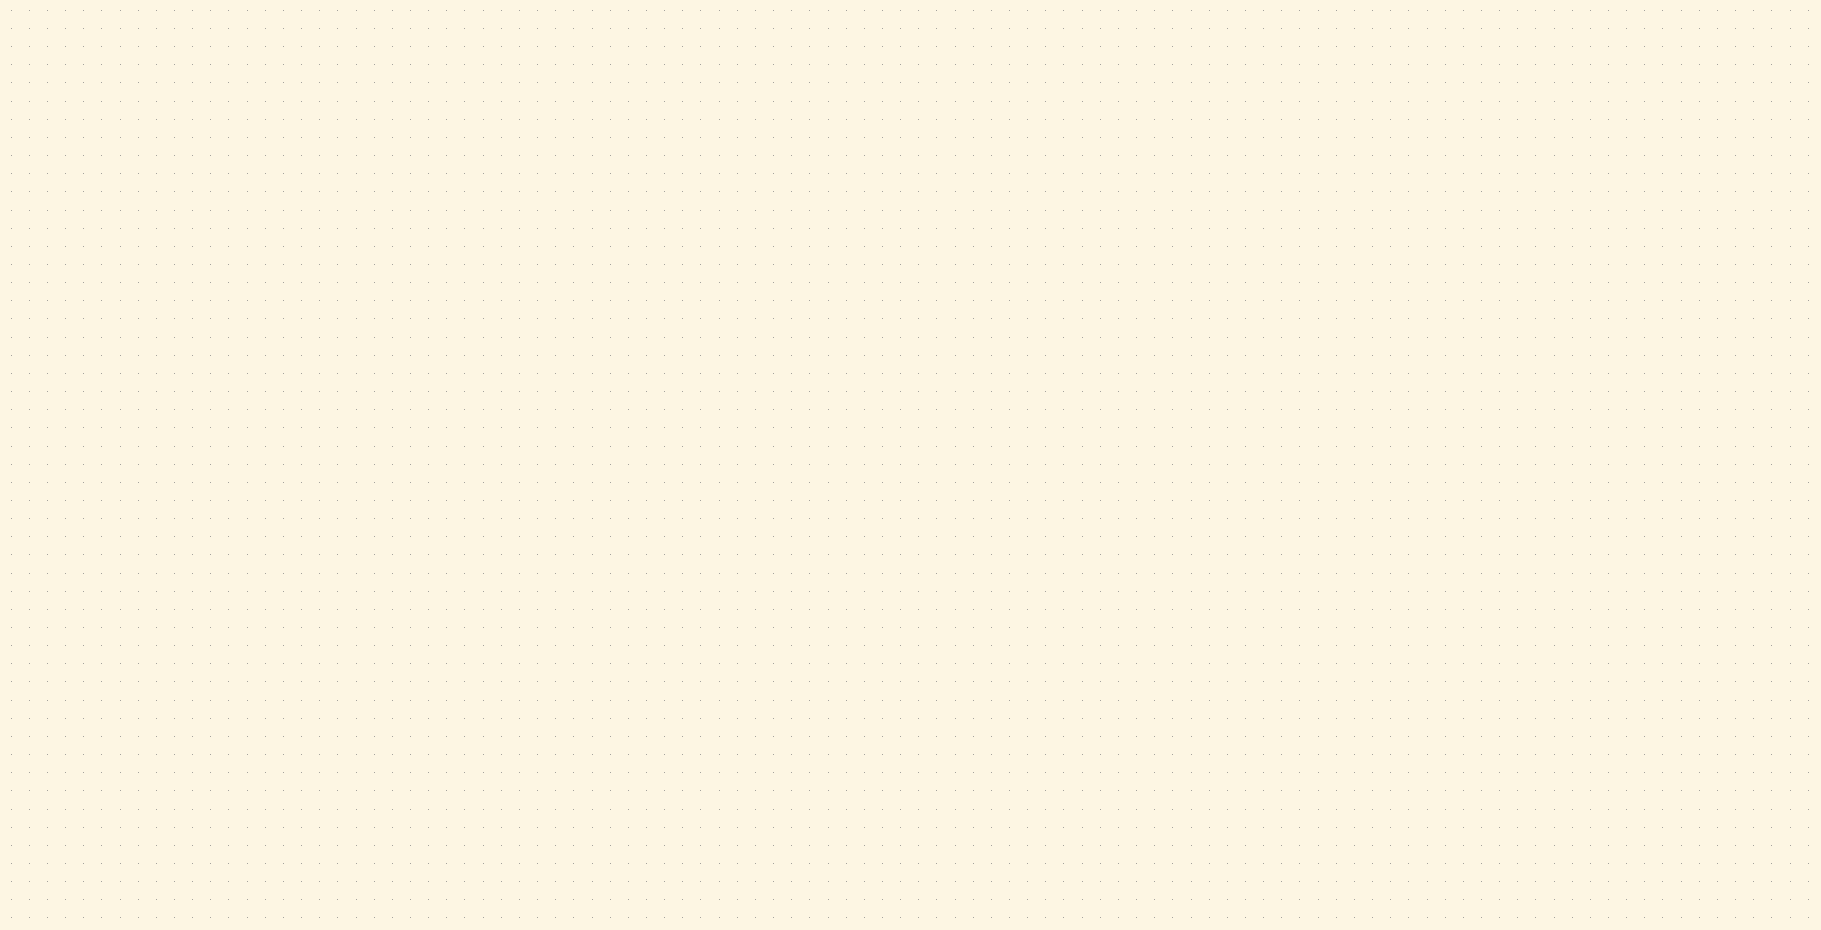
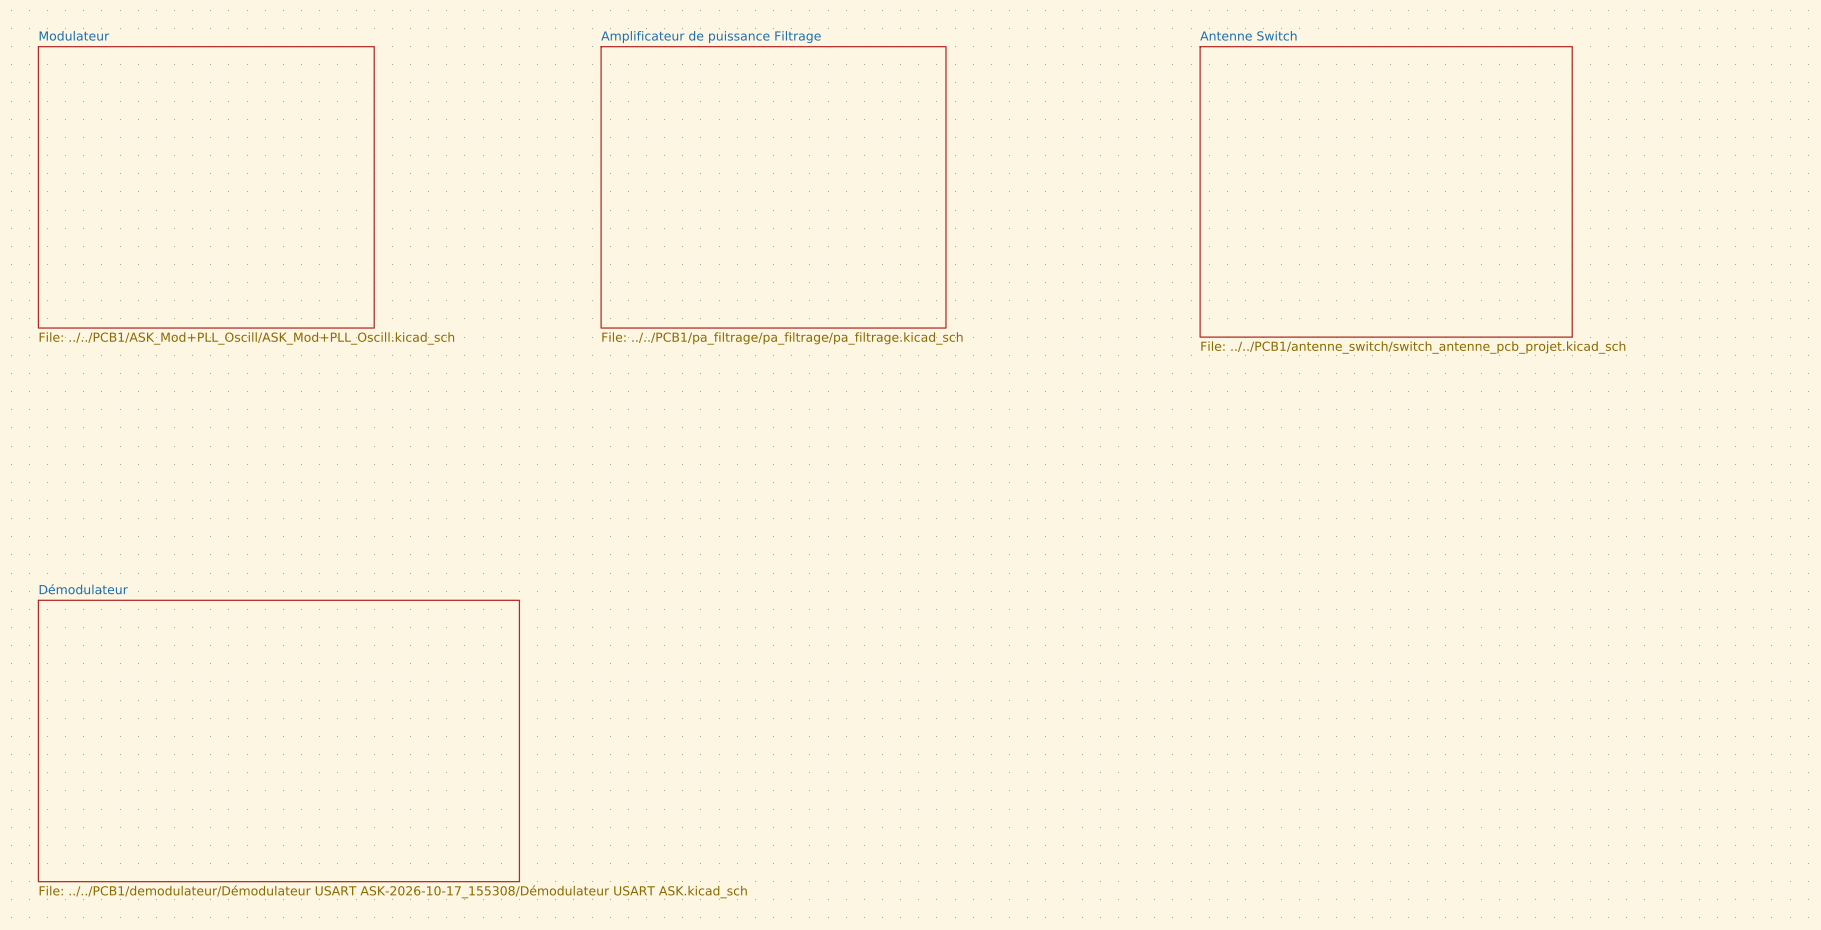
sheet Modulateur: none -> File: ../../PCB1/ASK_Mod+PLL_Oscill/ASK_Mod+PLL_Oscill.kicad_sch (206, 187)
sheet Amplificateur de puissance Filtrage: none -> File: ../../PCB1/pa_filtrage/pa_filtrage/pa_filtrage.kicad_sch (773, 187)
sheet Antenne Switch: none -> File: ../../PCB1/antenne_switch/switch_antenne_pcb_projet.kicad_sch (1386, 191)
sheet Démodulateur: none -> File: ../../PCB1/demodulateur/Démodulateur USART ASK-2026-10-17_155308/Démodulateur USART ASK.kicad_sch (278, 740)

